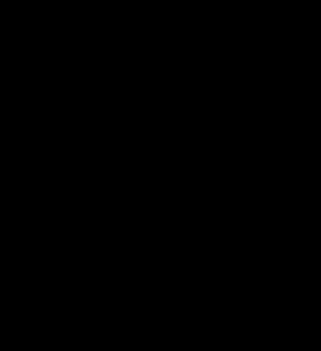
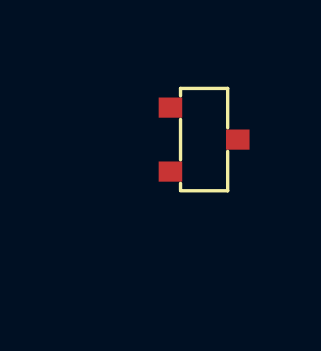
part: none -> (204, 139)

